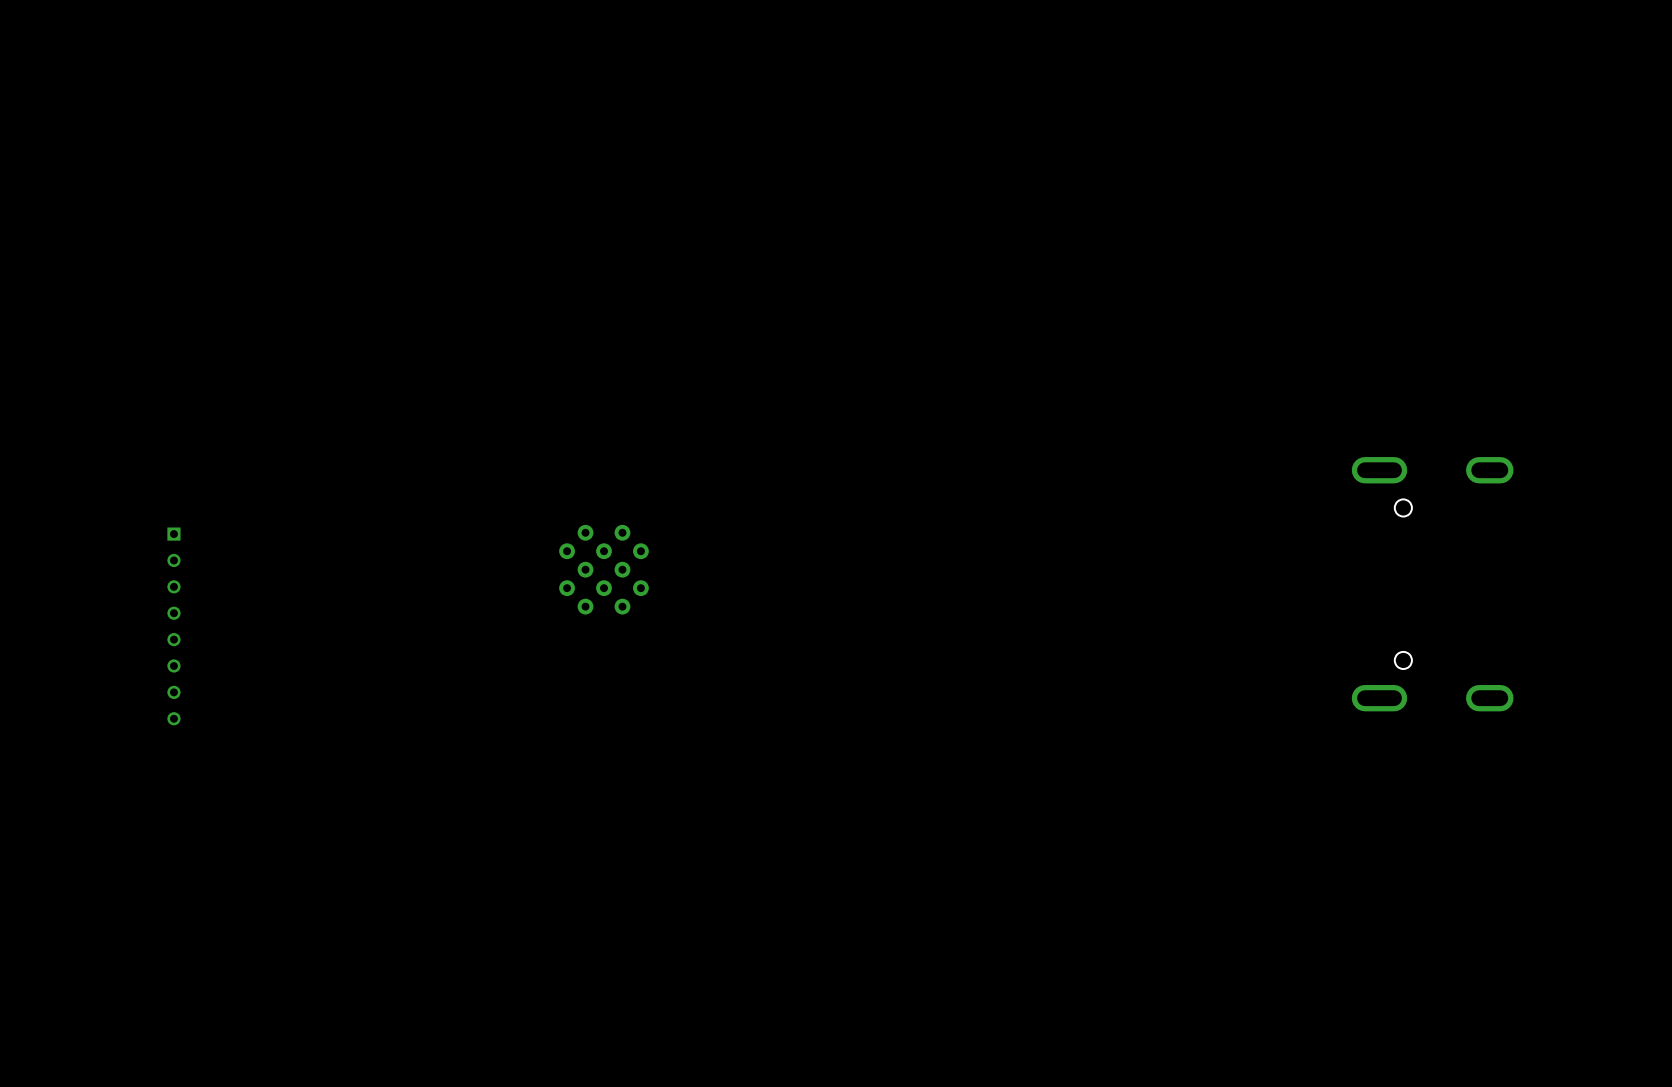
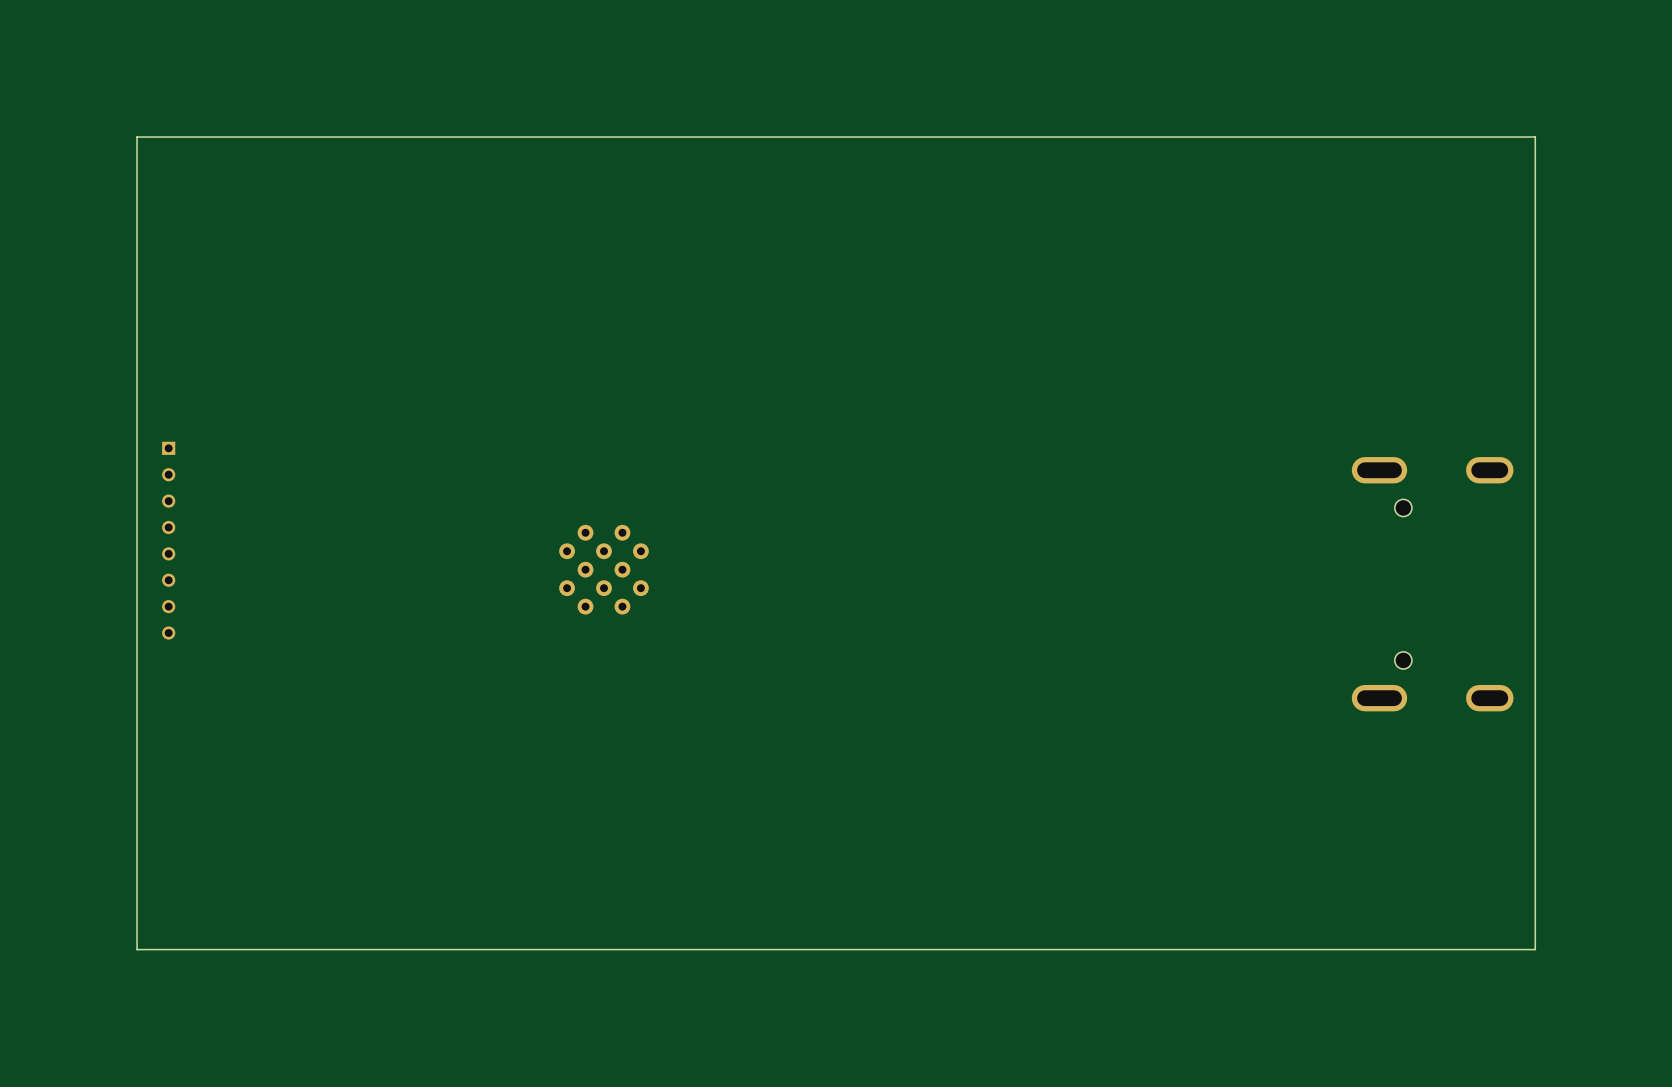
board edge: none -> (1535, 137) (137, 137) (137, 949) (1535, 949) (1535, 137)
part position: (173, 626) -> (168, 540)

